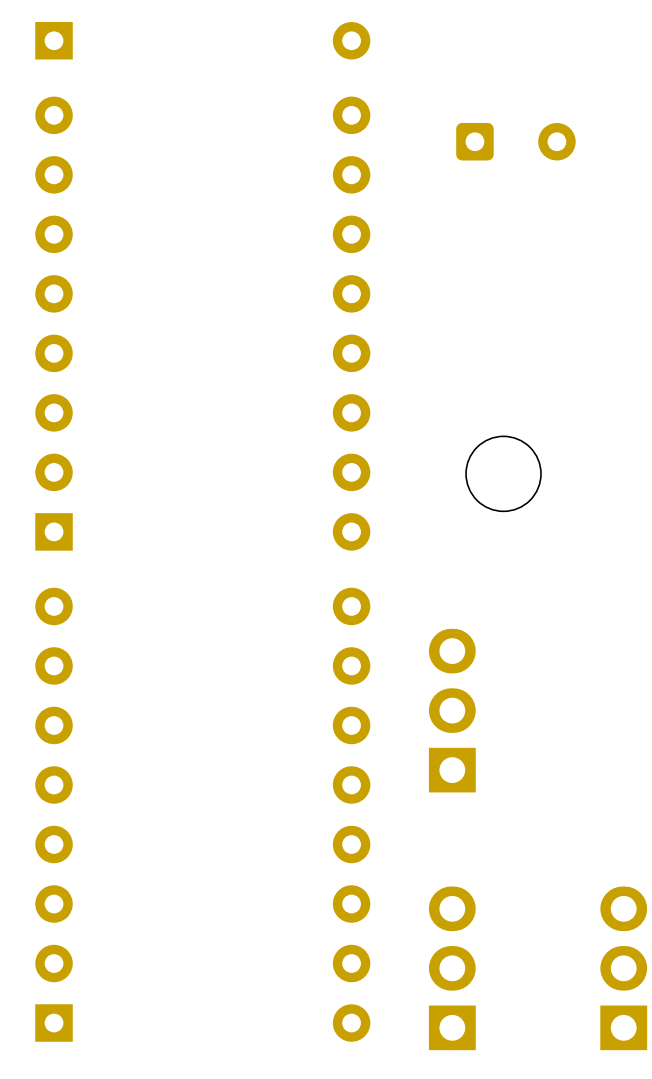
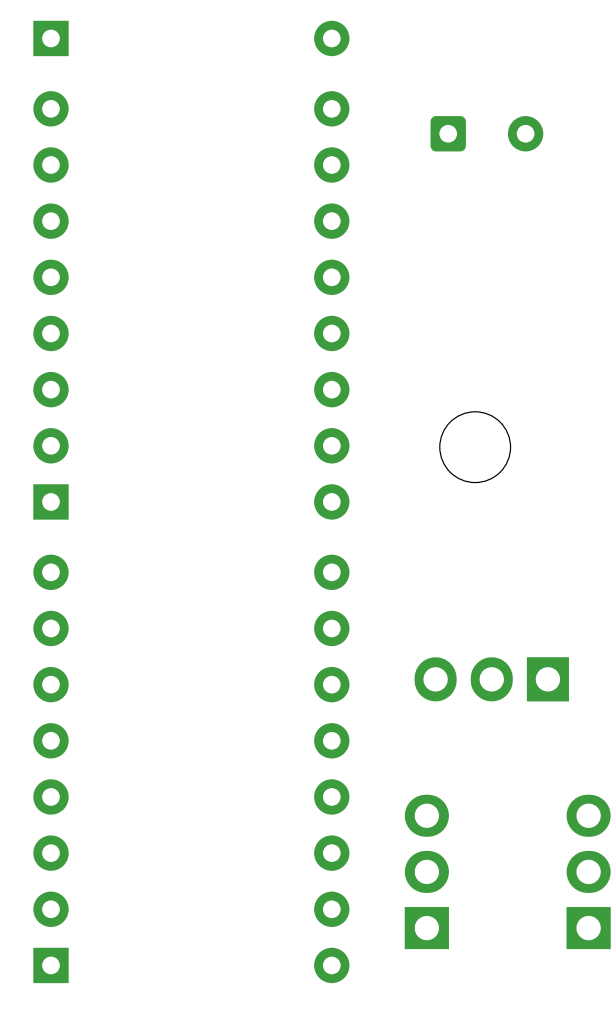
part rotation: 0° (452, 710) -> 90° counterclockwise (491, 679)
part position: (452, 968) -> (426, 871)
part position: (623, 968) -> (588, 871)

